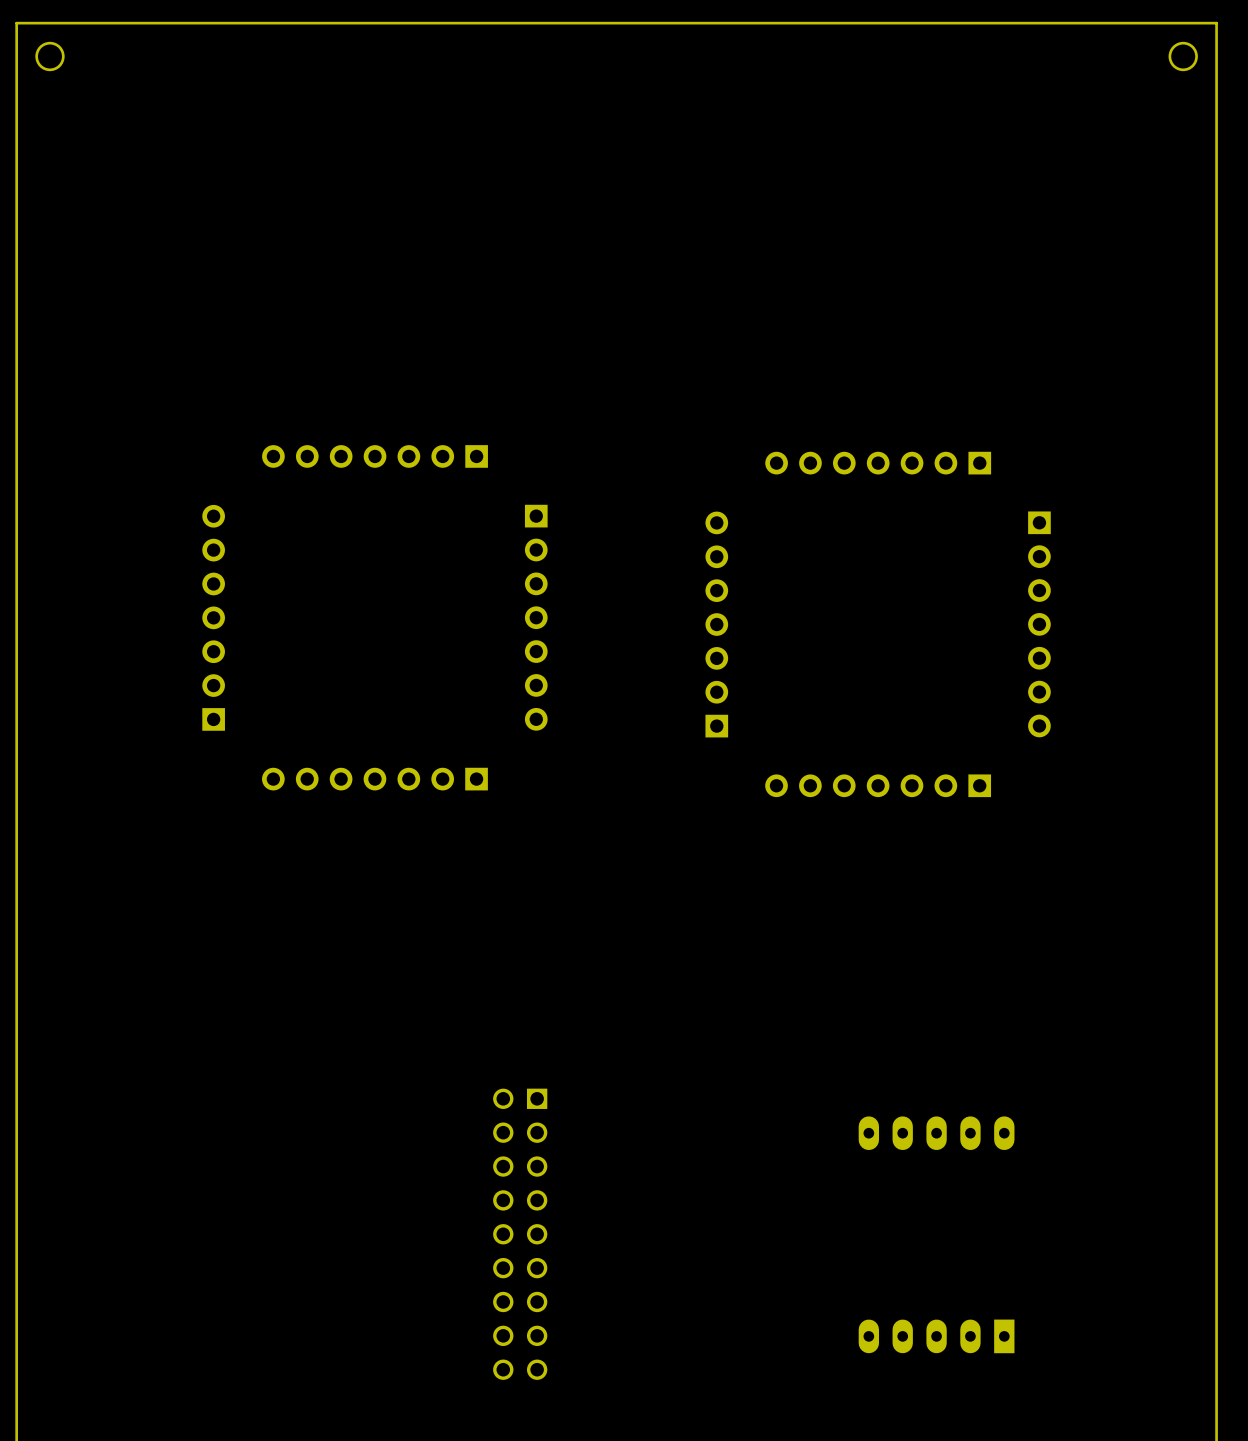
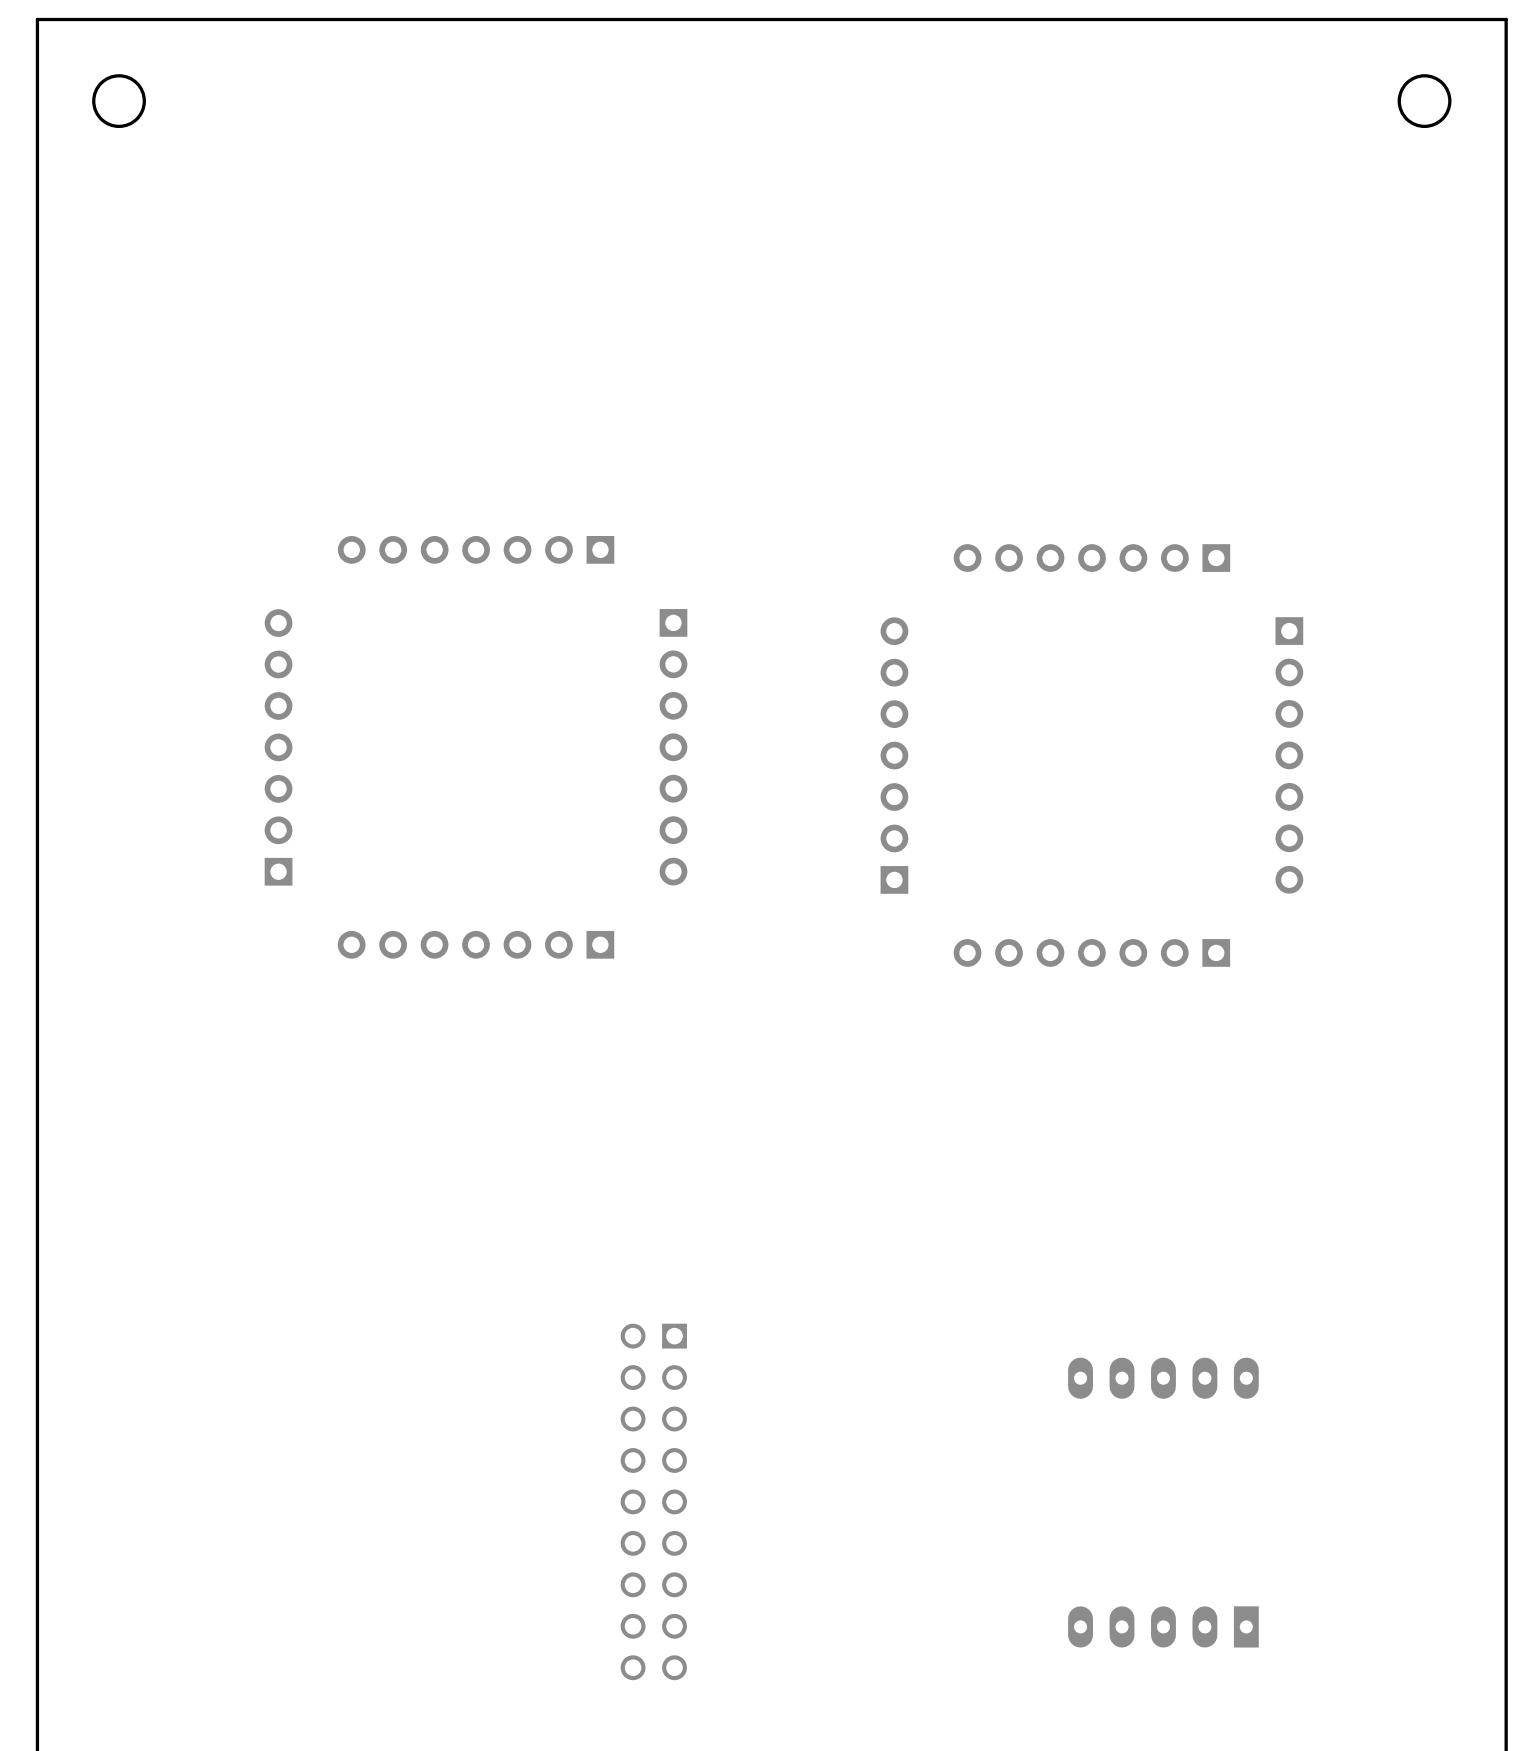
round board edge: [35, 41, 65, 72] -> none
round board edge: [1168, 41, 1198, 72] -> none
round board edge: none -> [92, 74, 146, 129]
round board edge: none -> [1397, 74, 1452, 129]

